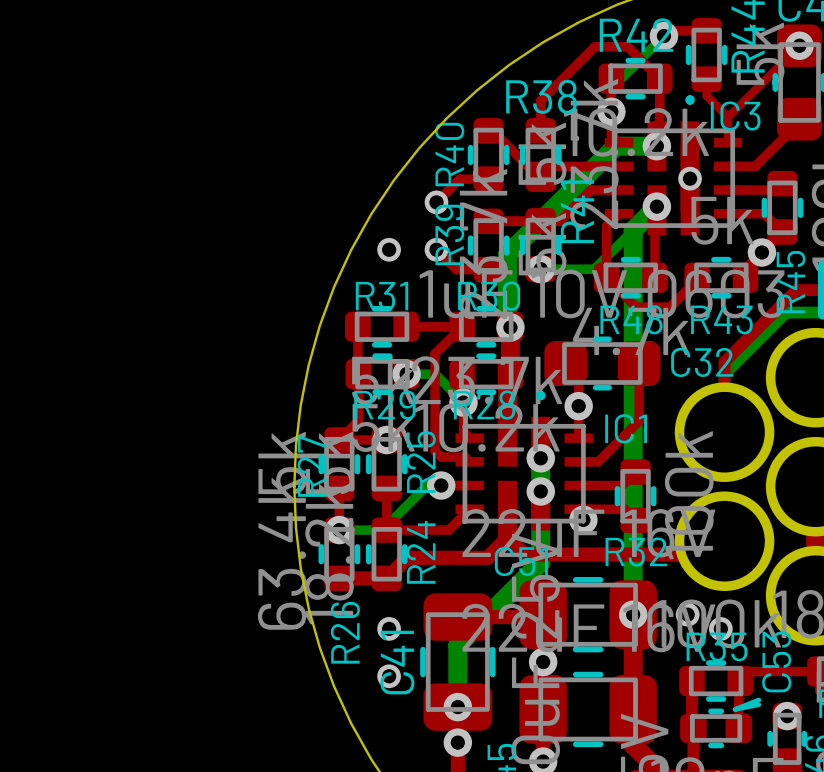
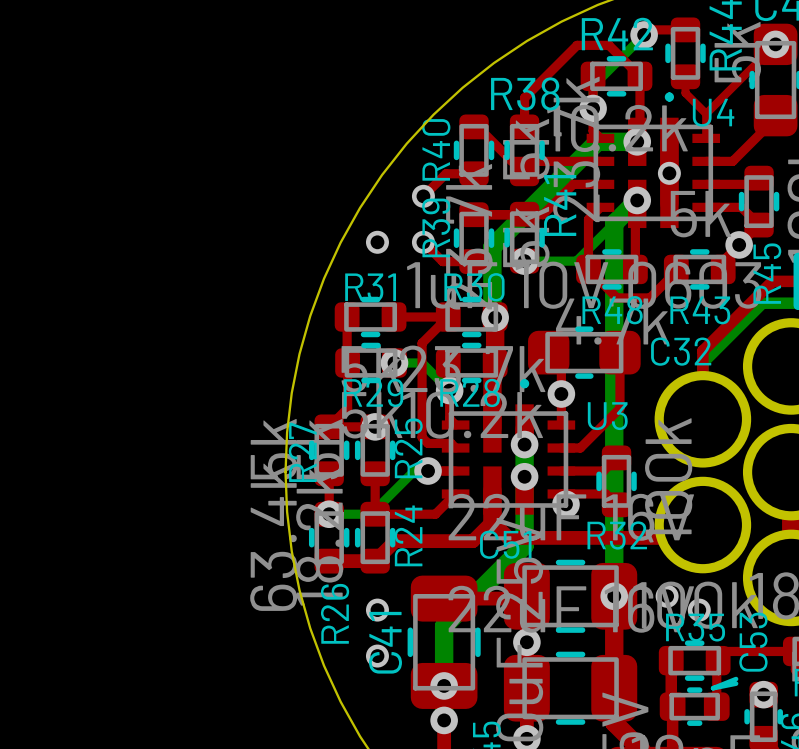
IC3 name: IC3 (735, 116) -> U4 (713, 112)
IC1 name: IC1 (626, 428) -> U3 (607, 416)

